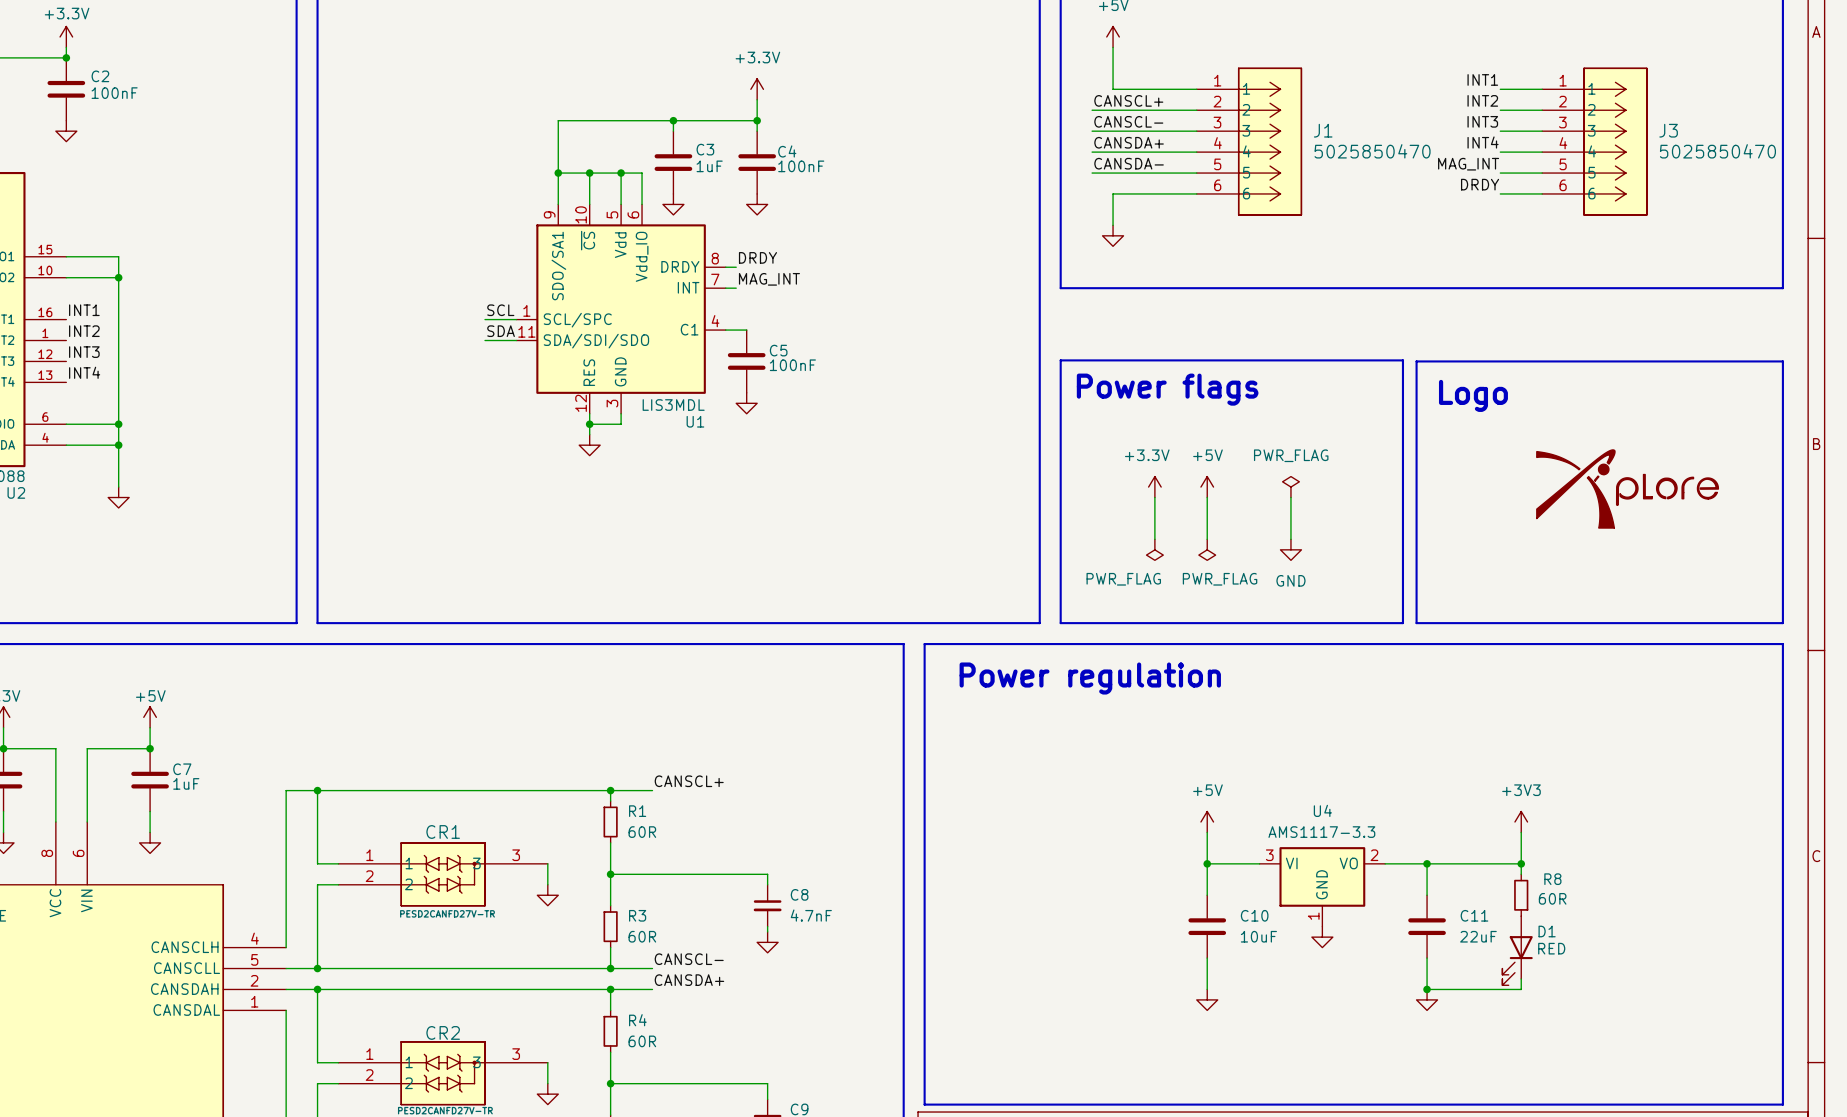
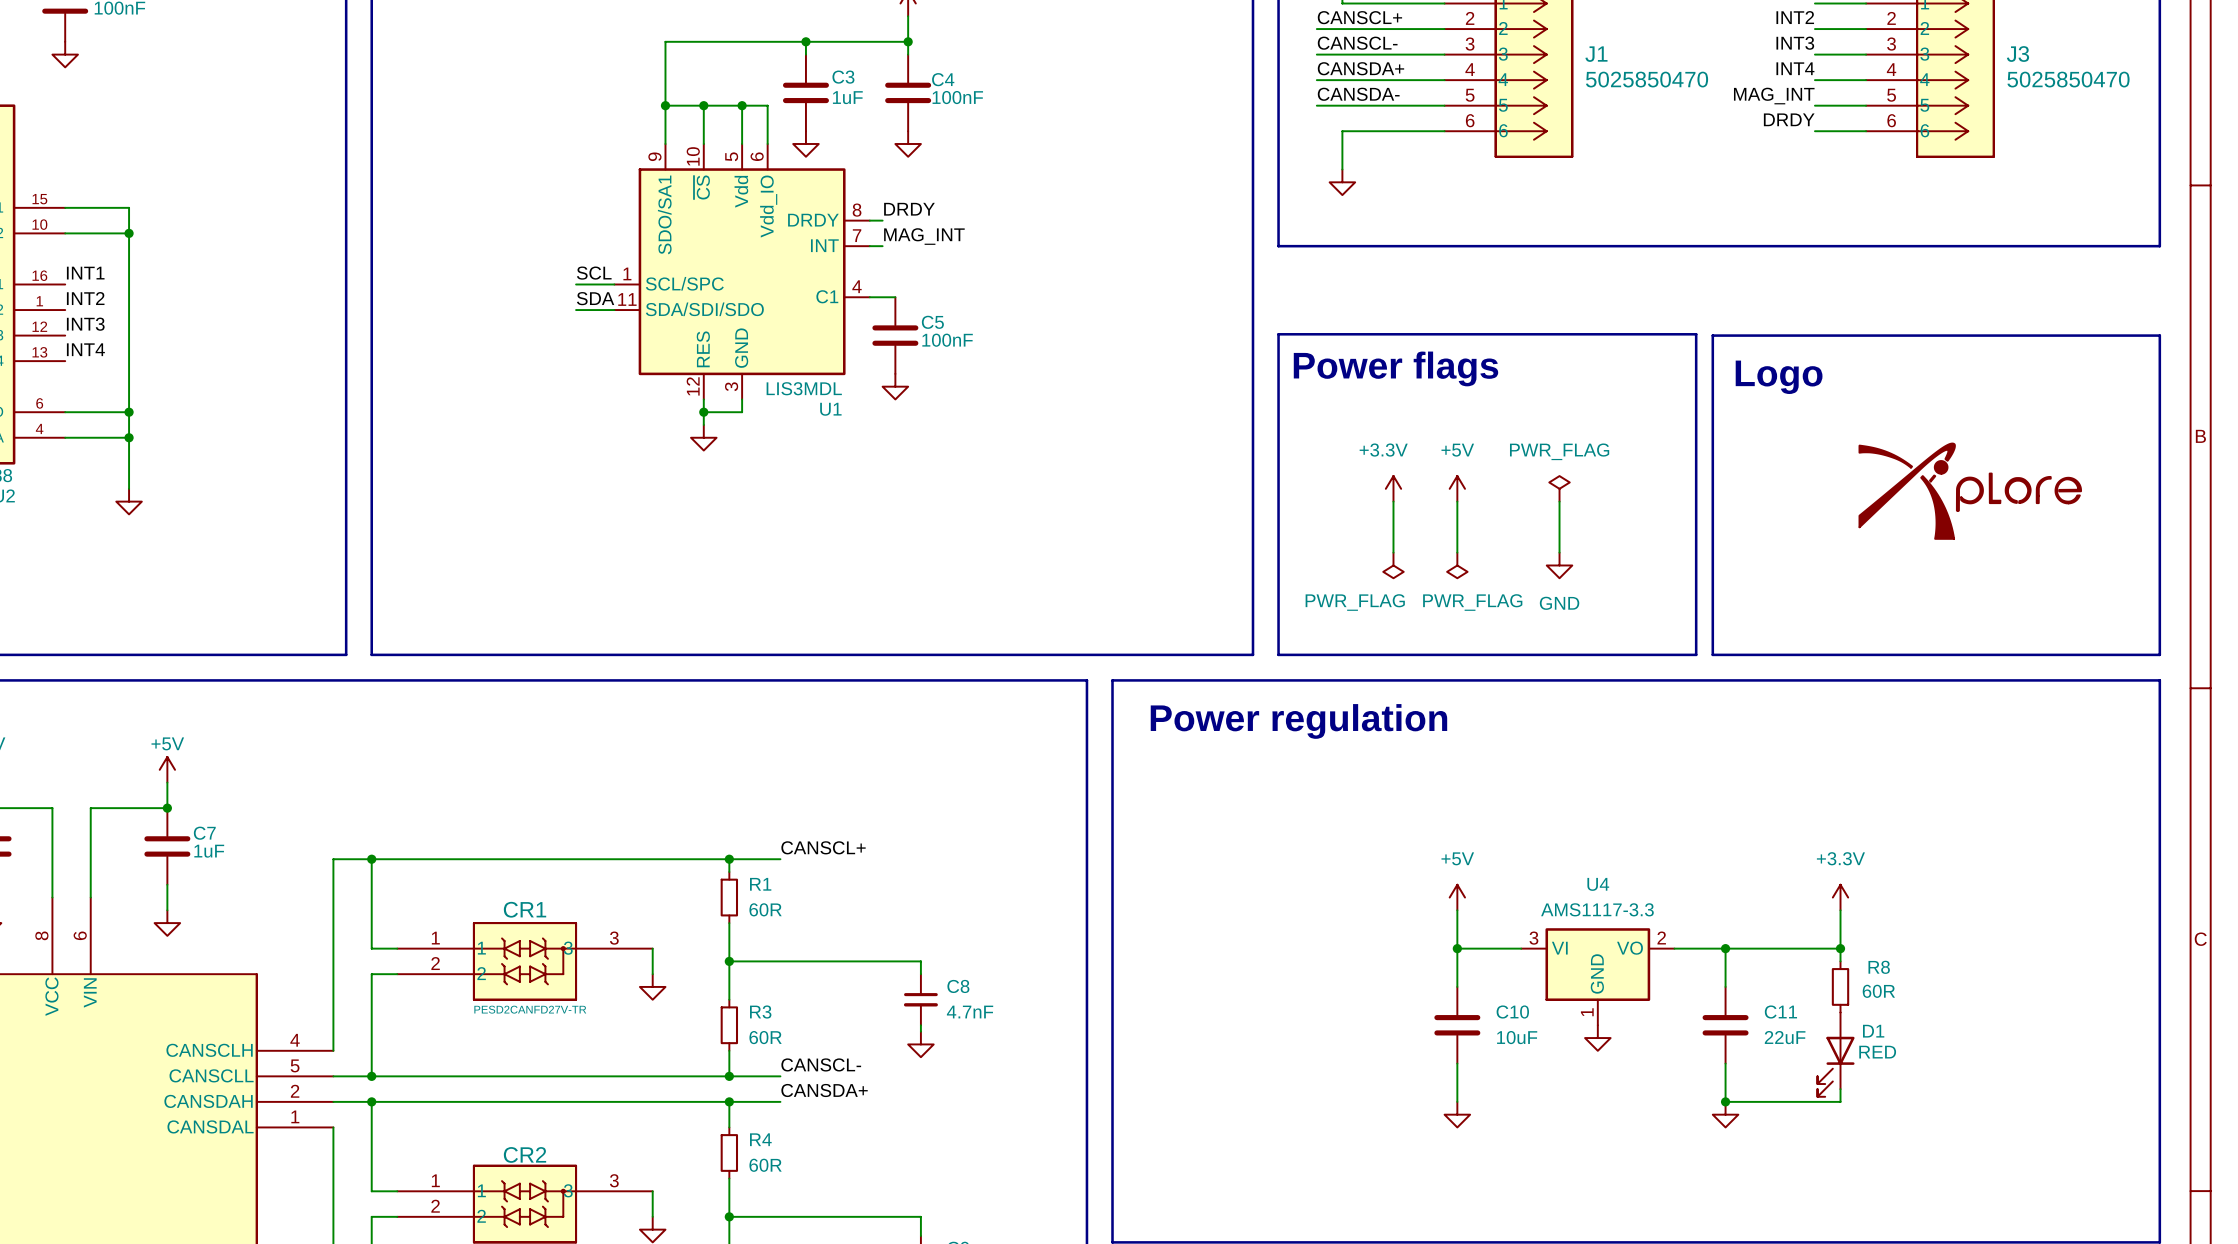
power symbol: +3V3 (1521, 821) -> +3.3V (1840, 897)

